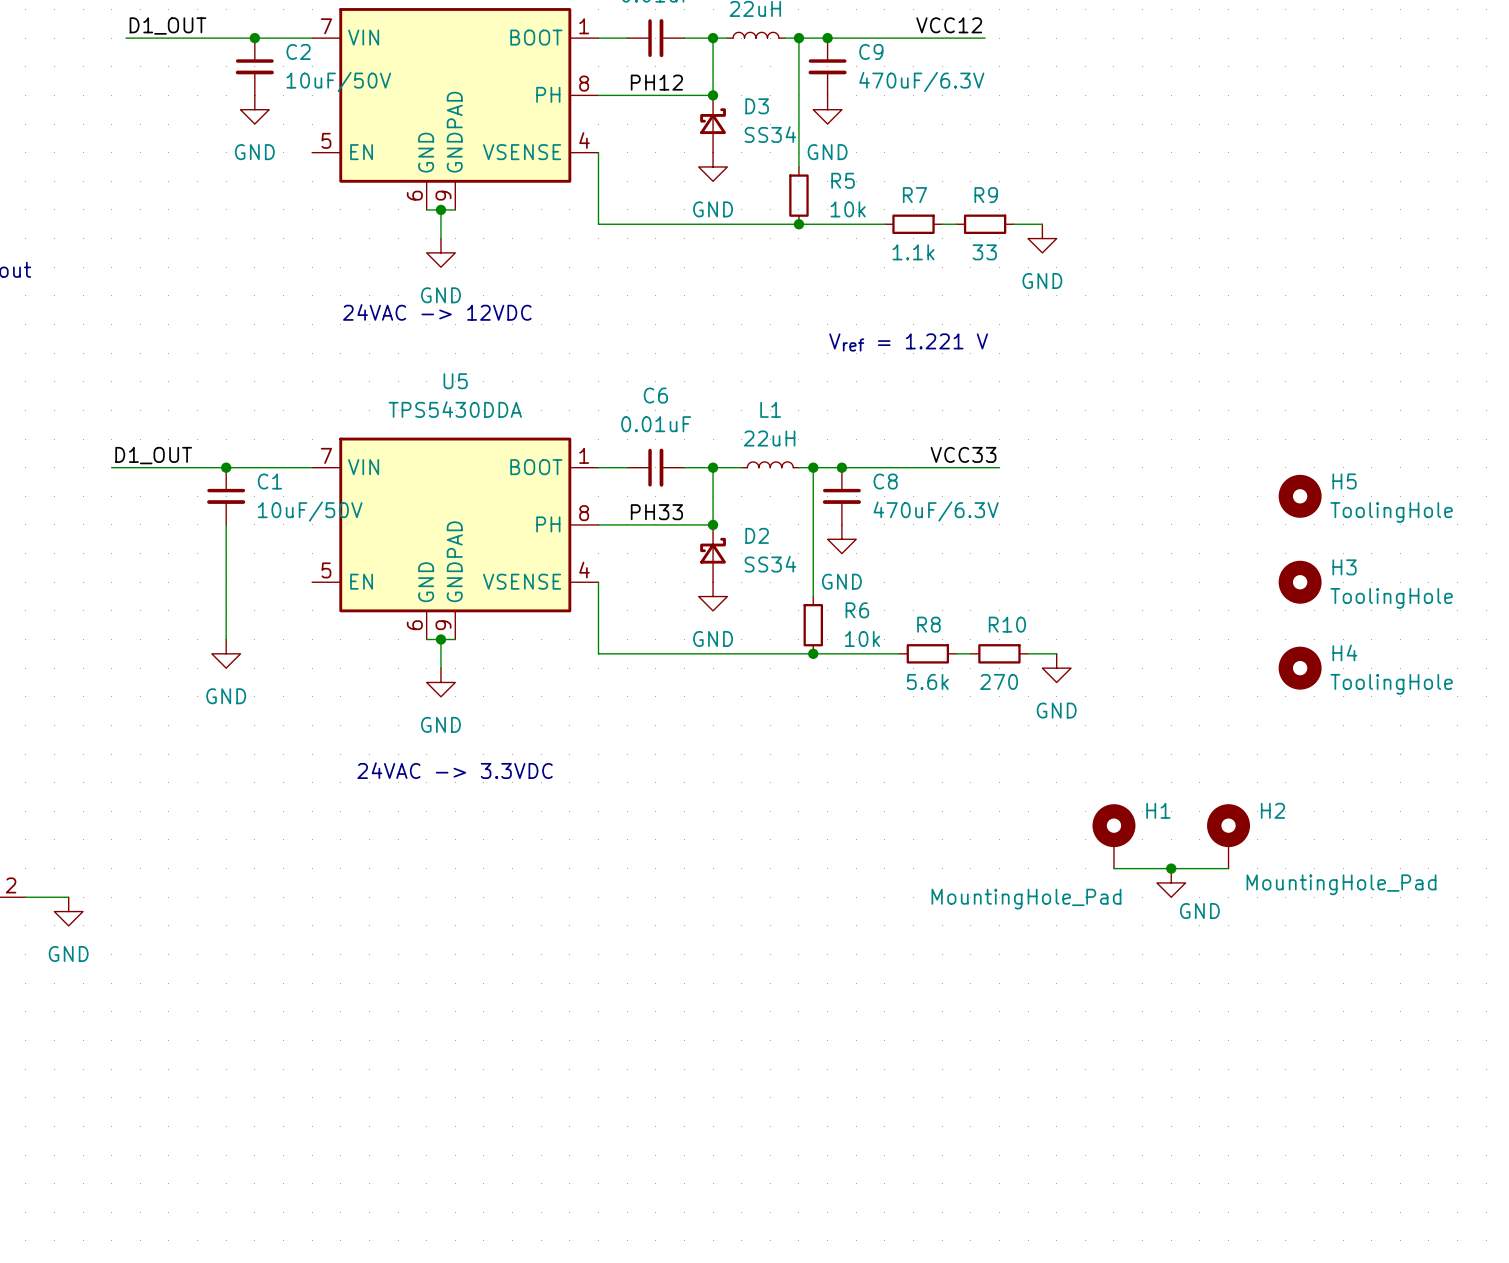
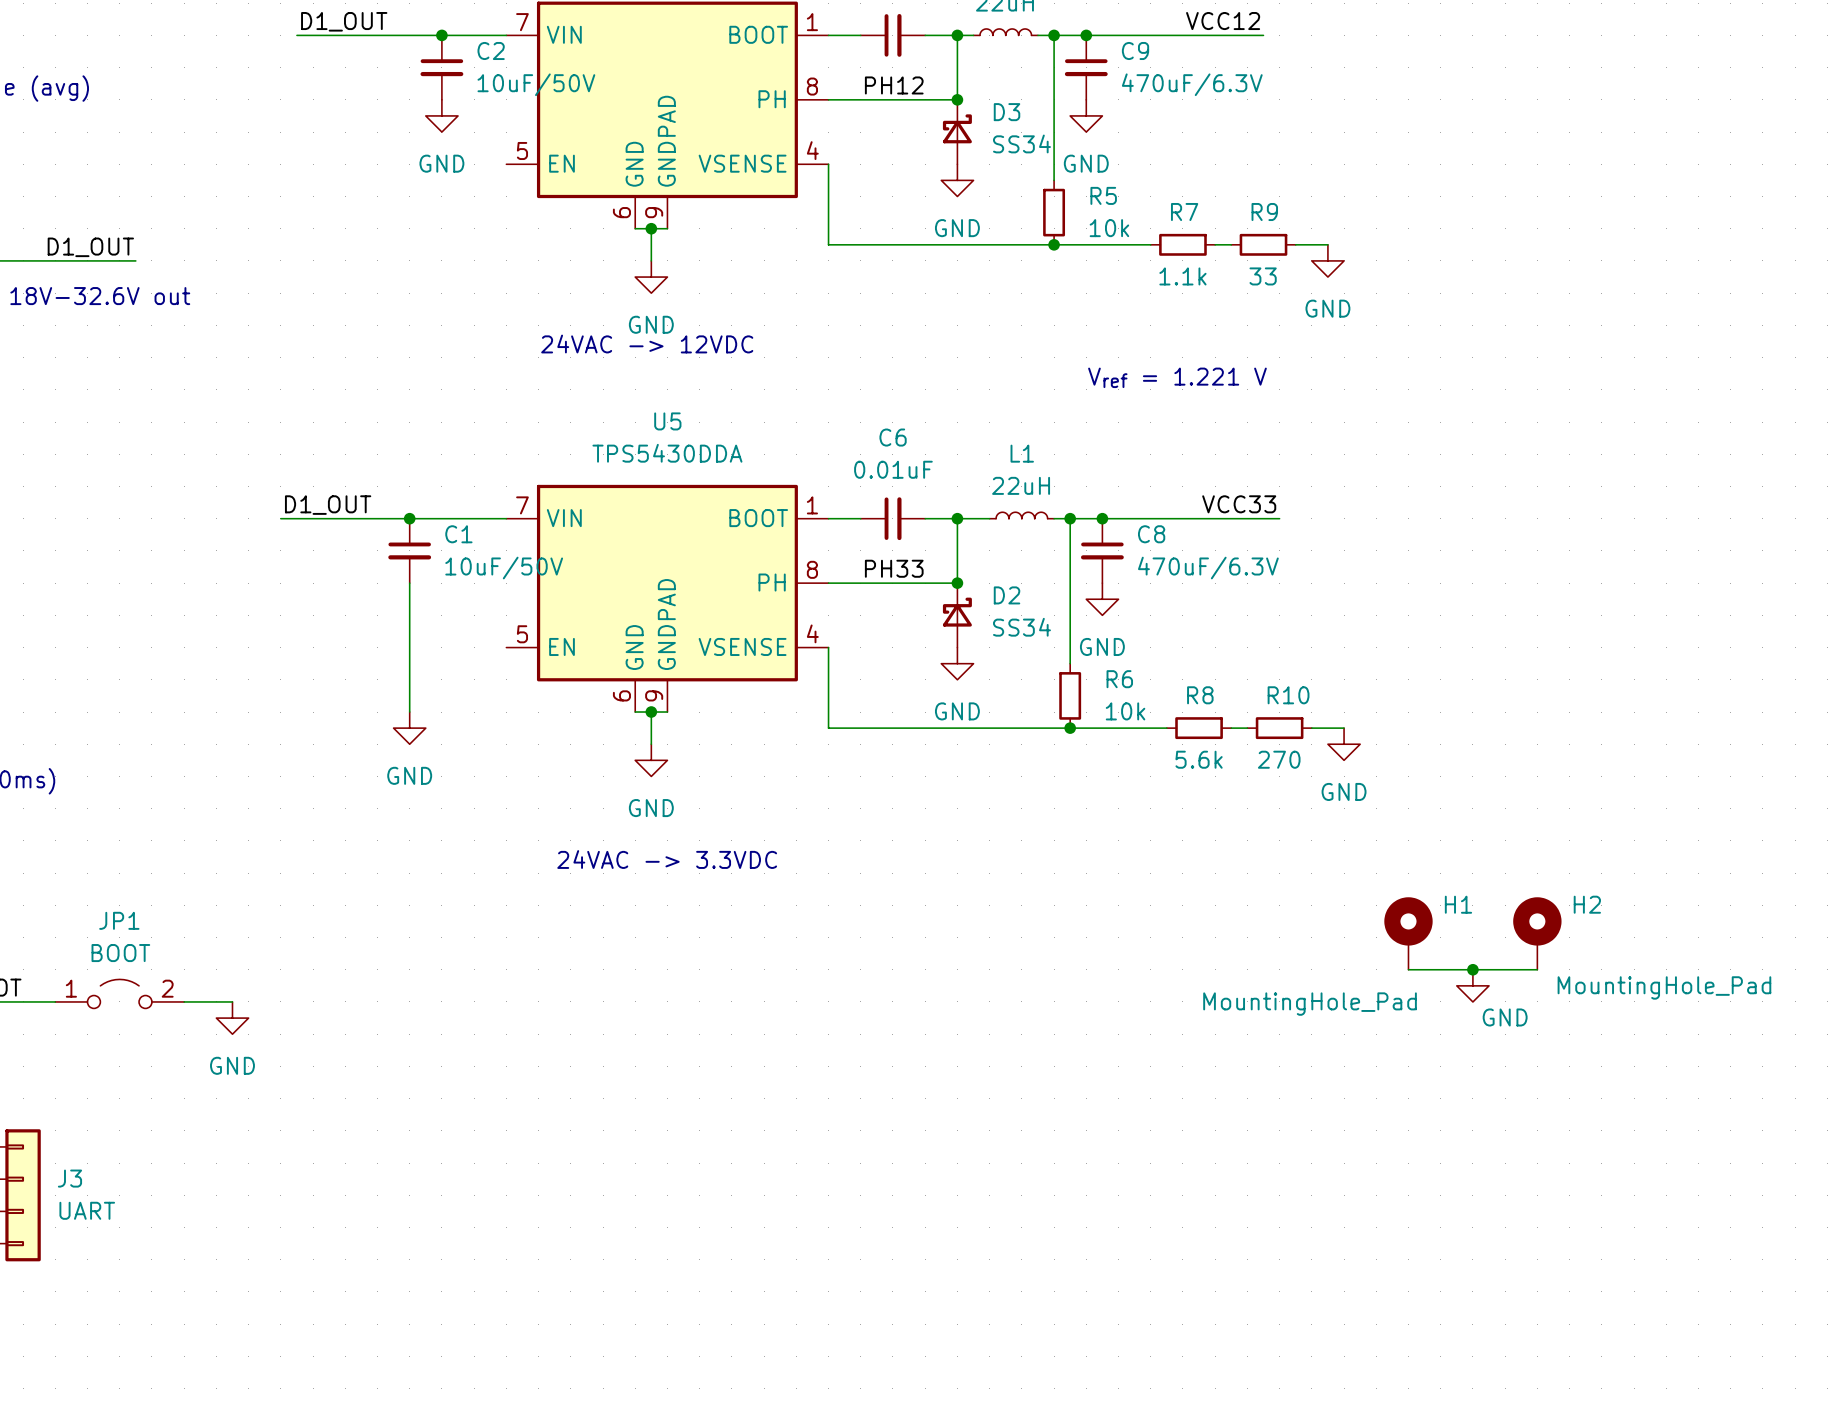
H5: ToolingHole (1300, 496) -> none
H3: ToolingHole (1300, 582) -> none
H4: ToolingHole (1300, 668) -> none

